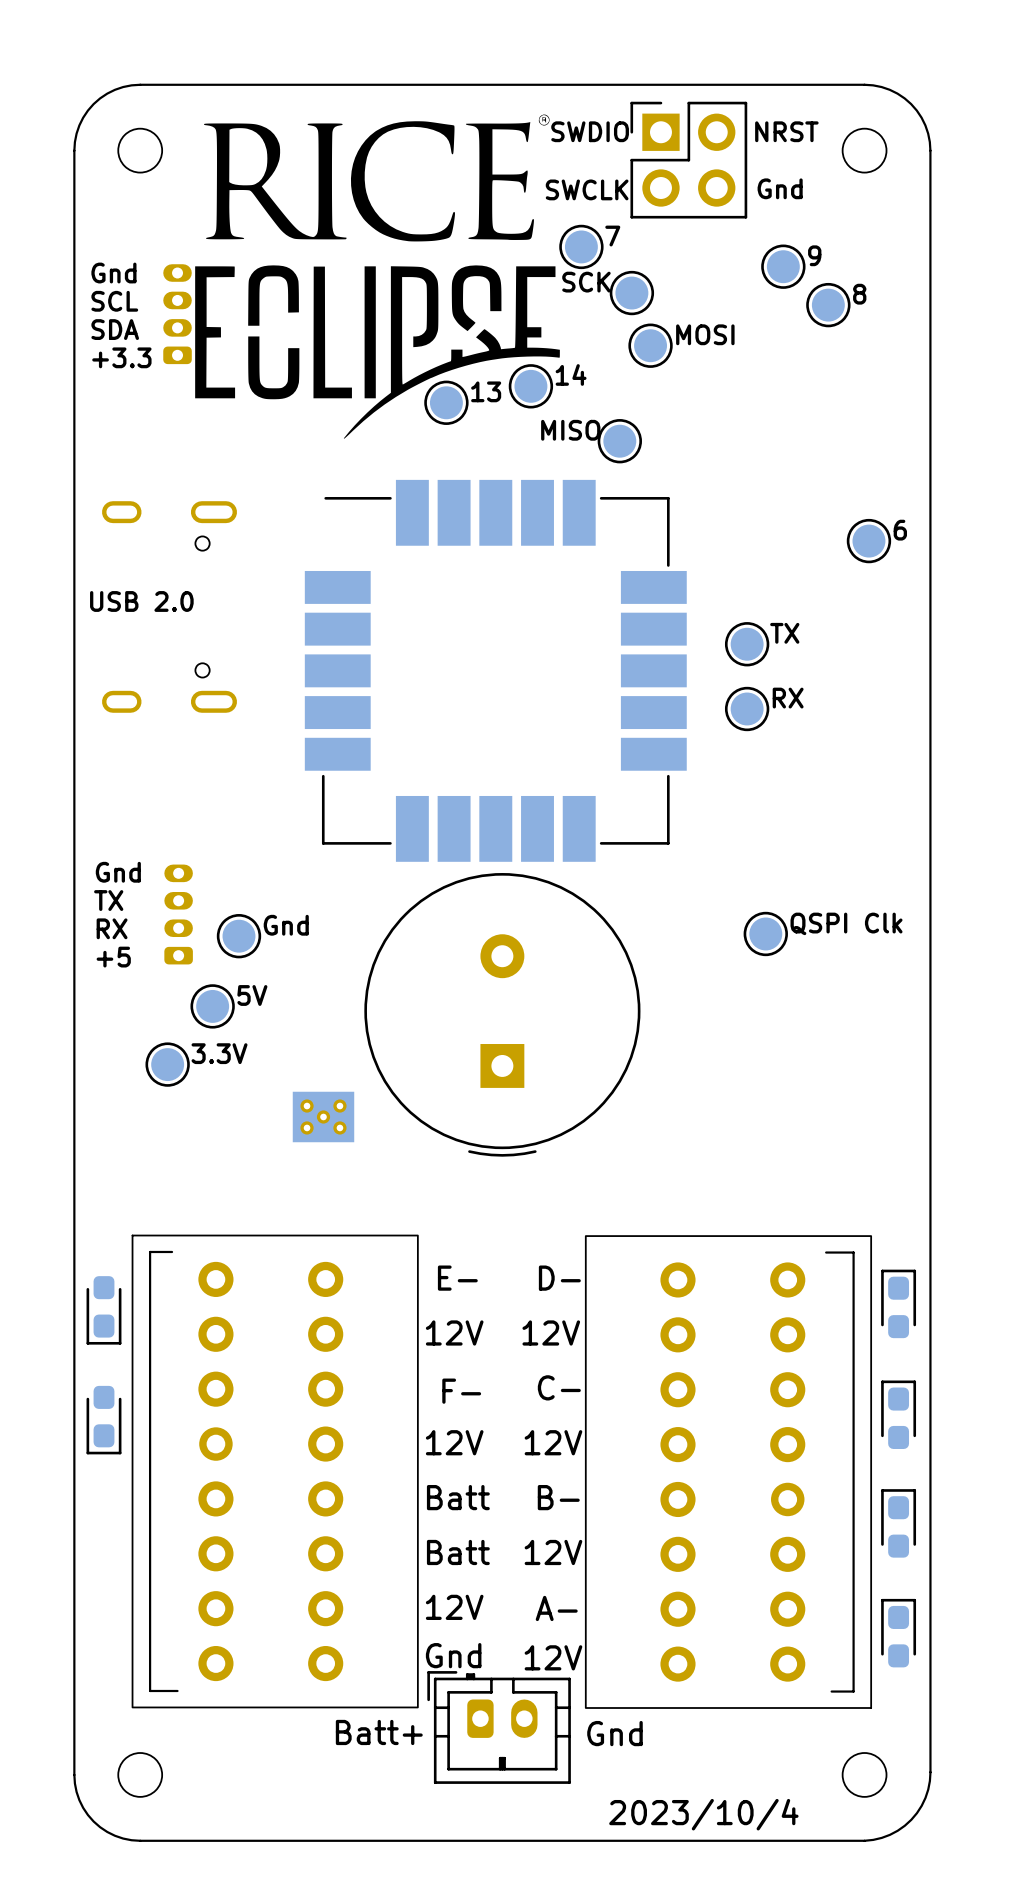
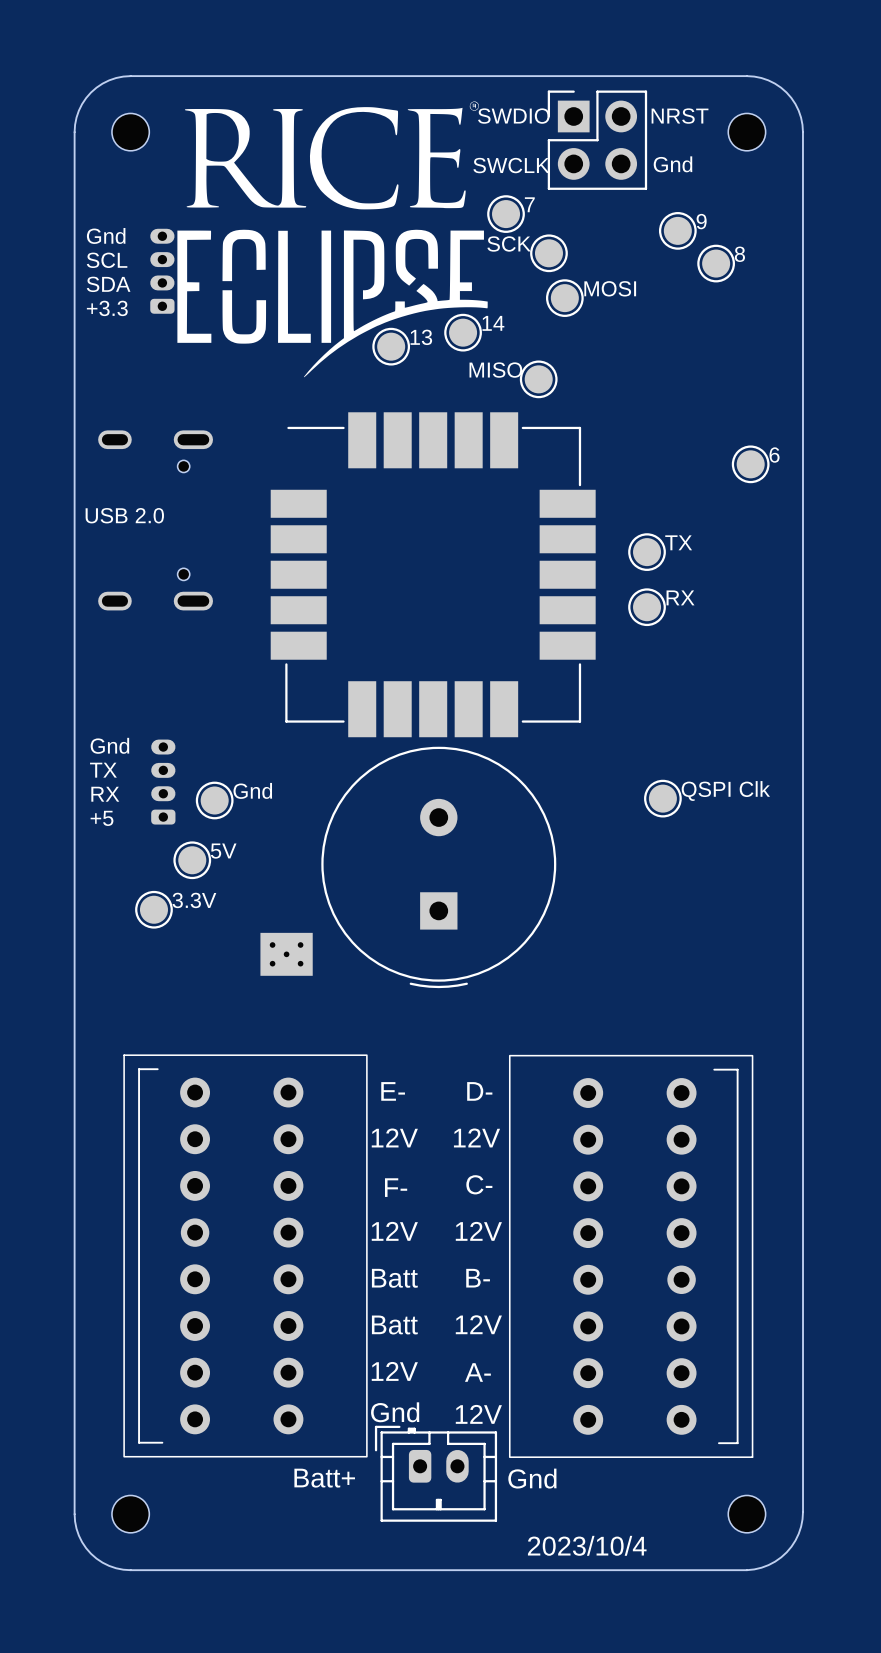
part: (898, 1303) -> none
part: (103, 1310) -> none
part: (898, 1414) -> none
part: (103, 1420) -> none
part: (898, 1523) -> none
part: (898, 1633) -> none

